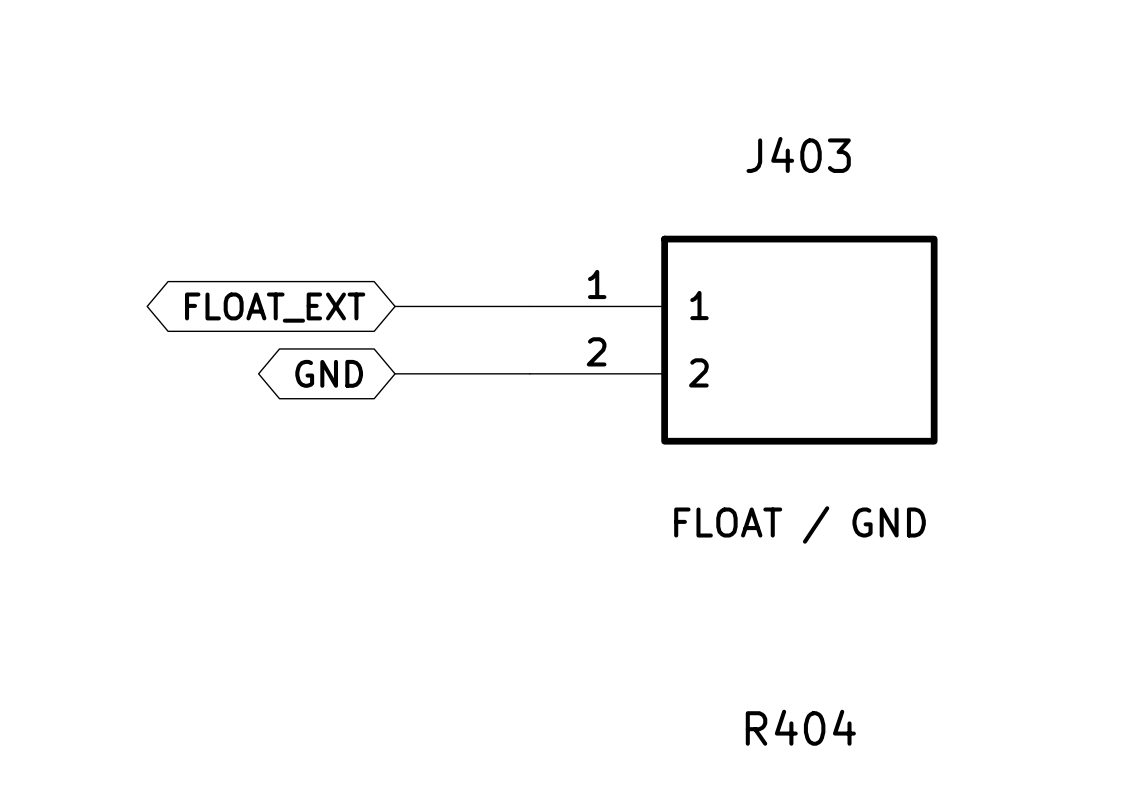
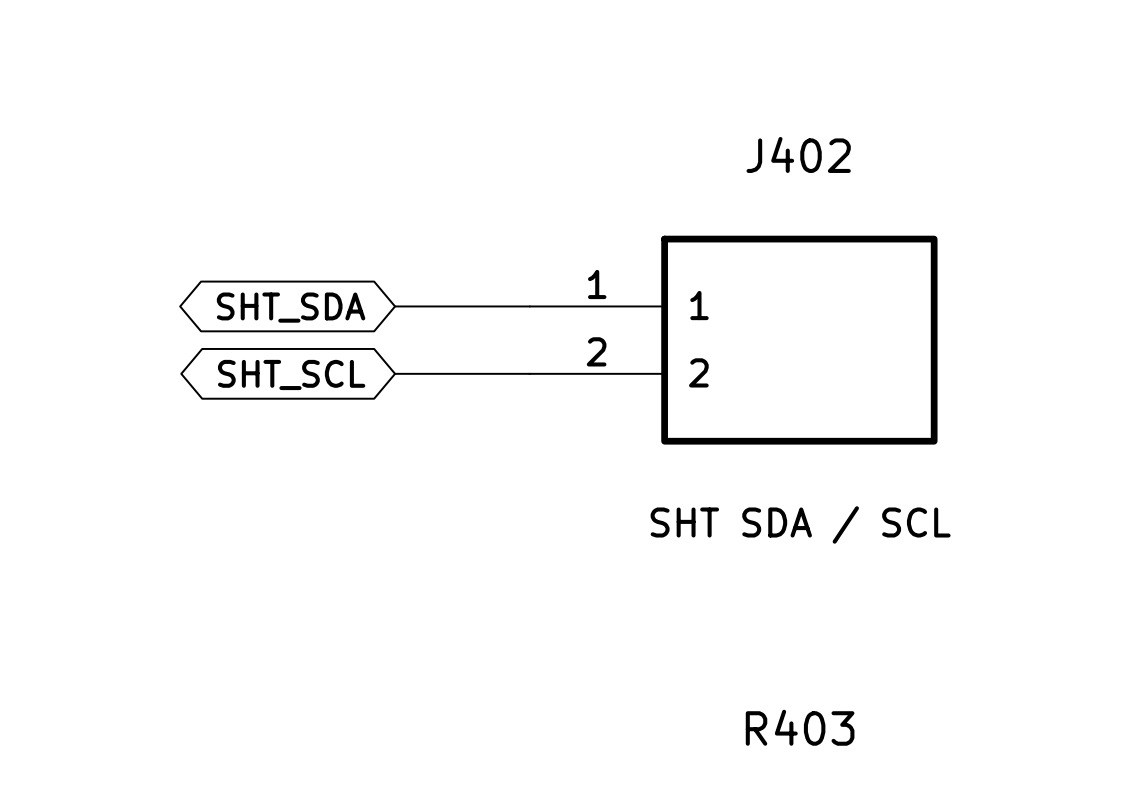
J403 name: J403 (798, 154) -> J402 (798, 154)
global label: FLOAT_EXT (275, 307) -> SHT_SDA (291, 307)
global label: GND (329, 373) -> SHT_SCL (291, 374)
J403 value: FLOAT / GND (800, 524) -> SHT SDA / SCL (800, 524)
R404 name: R404 (800, 727) -> R403 (800, 727)

